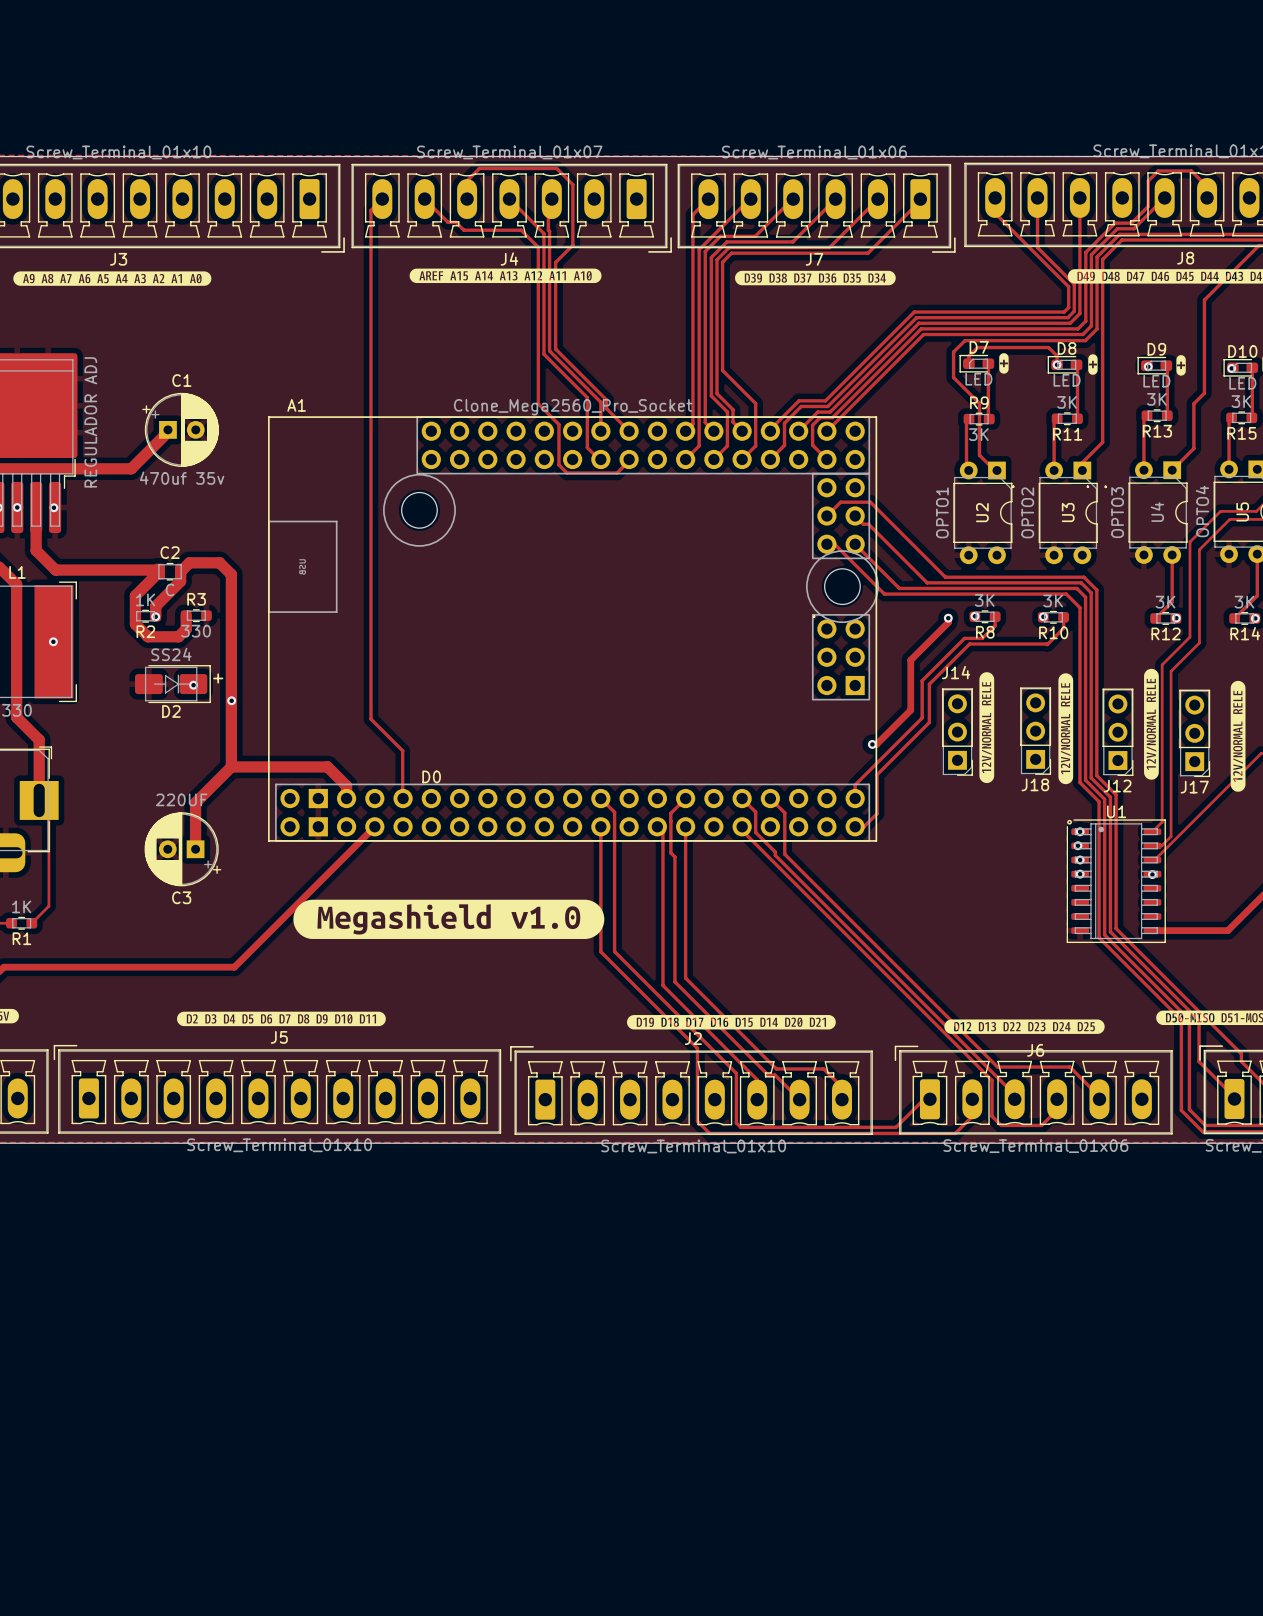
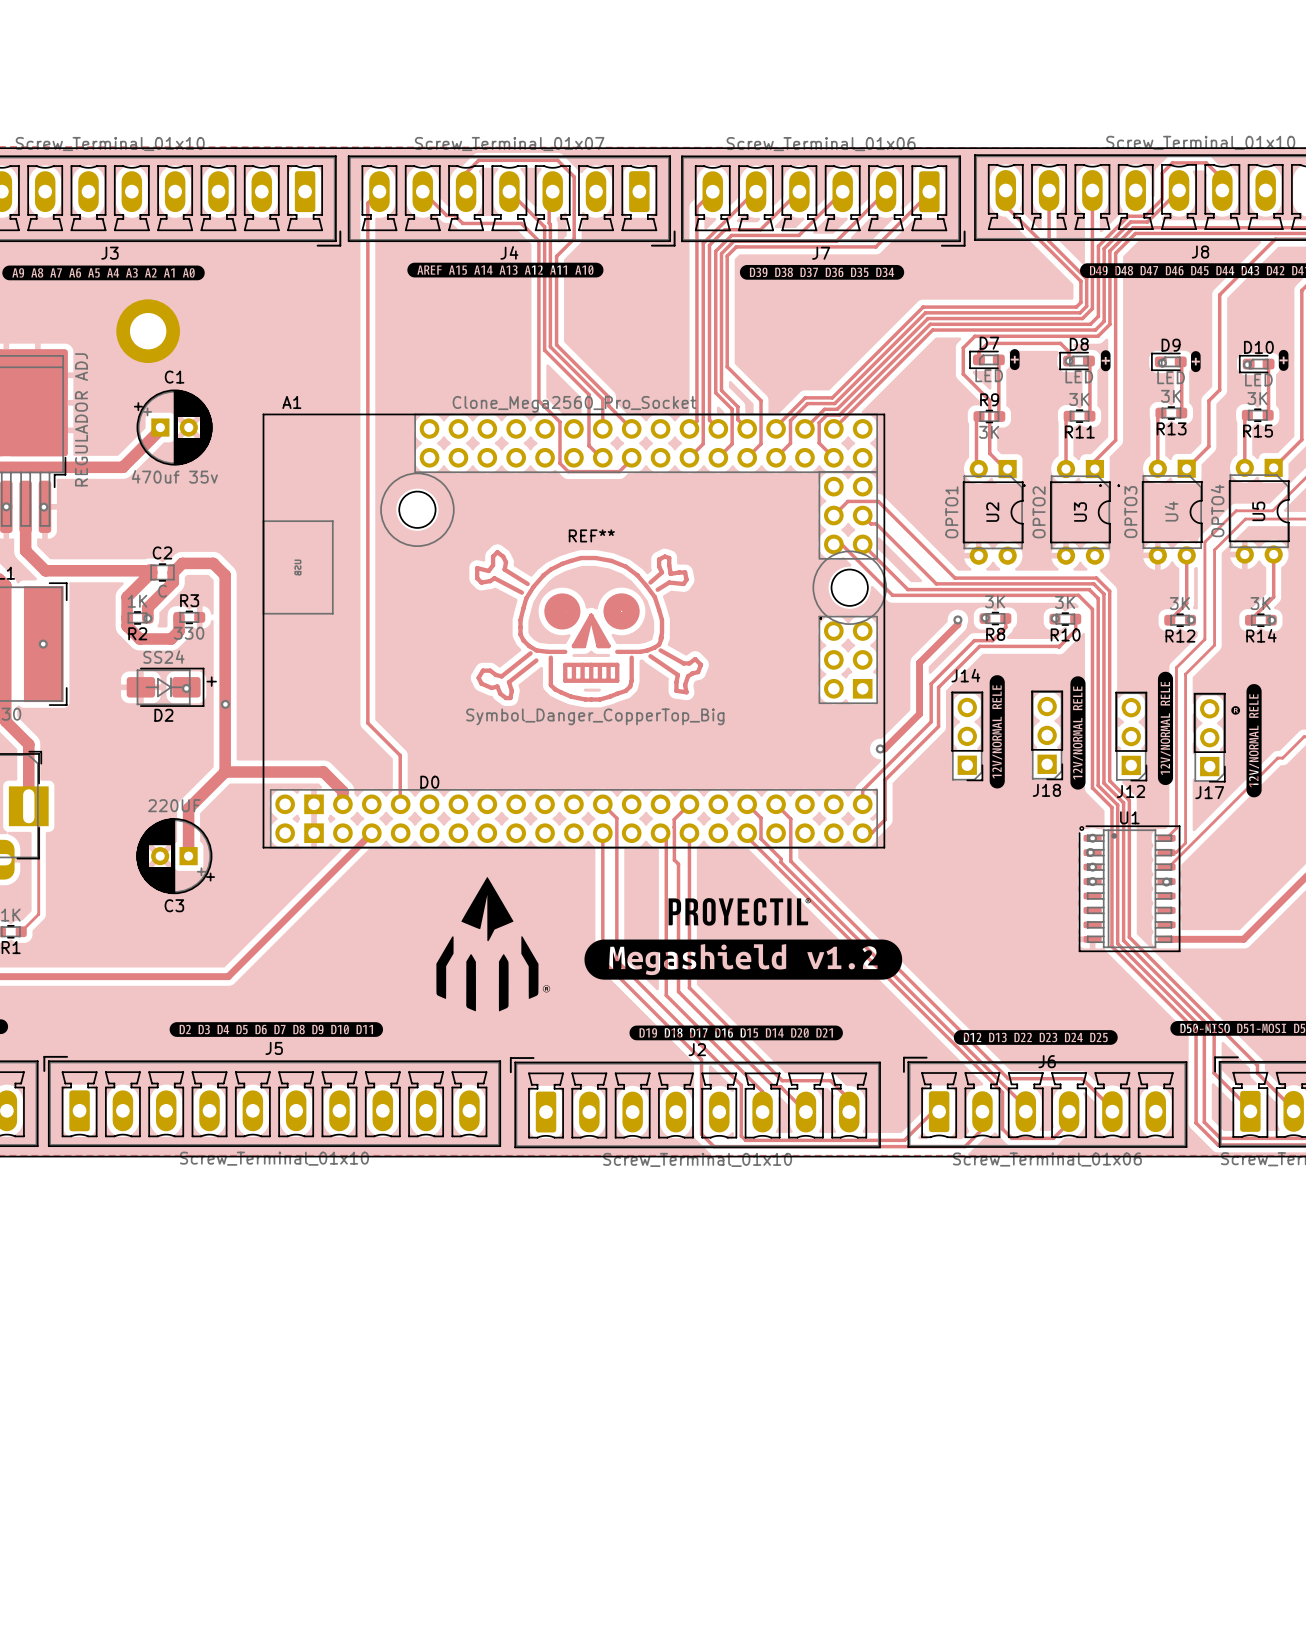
part: none -> (148, 331)
REF**: none -> Symbol_Danger_CopperTop_Big (589, 625)
drawing: none -> [1231, 706, 1241, 715]
drawing: none -> [436, 876, 551, 1012]
drawing: none -> [668, 898, 811, 926]
drawing: [293, 899, 605, 939] -> none
drawing: none -> [584, 939, 903, 980]

